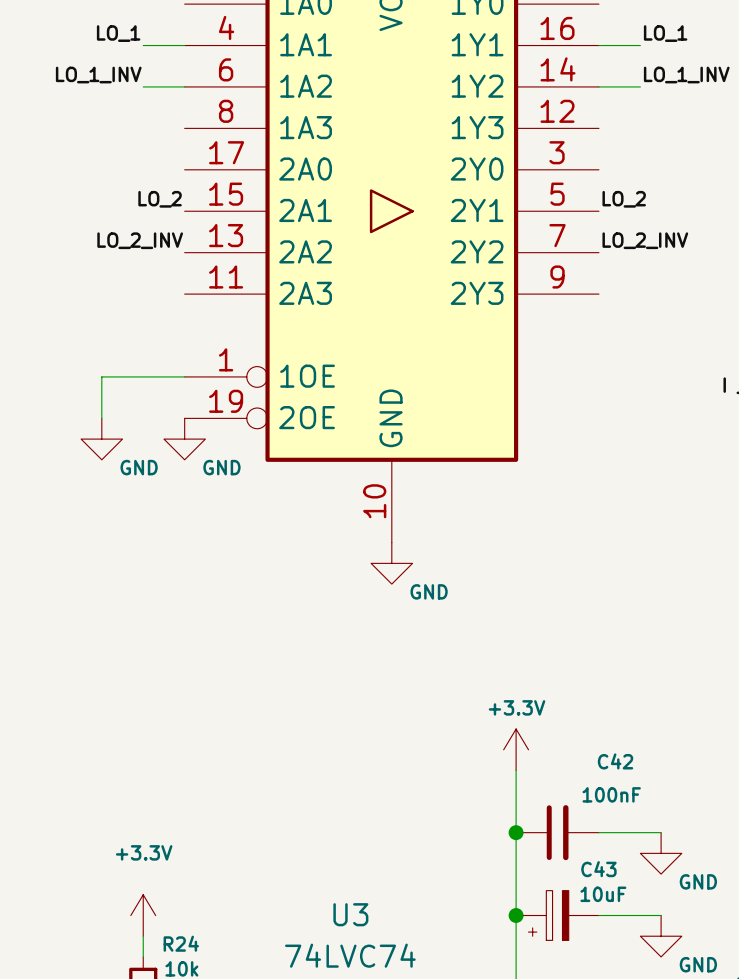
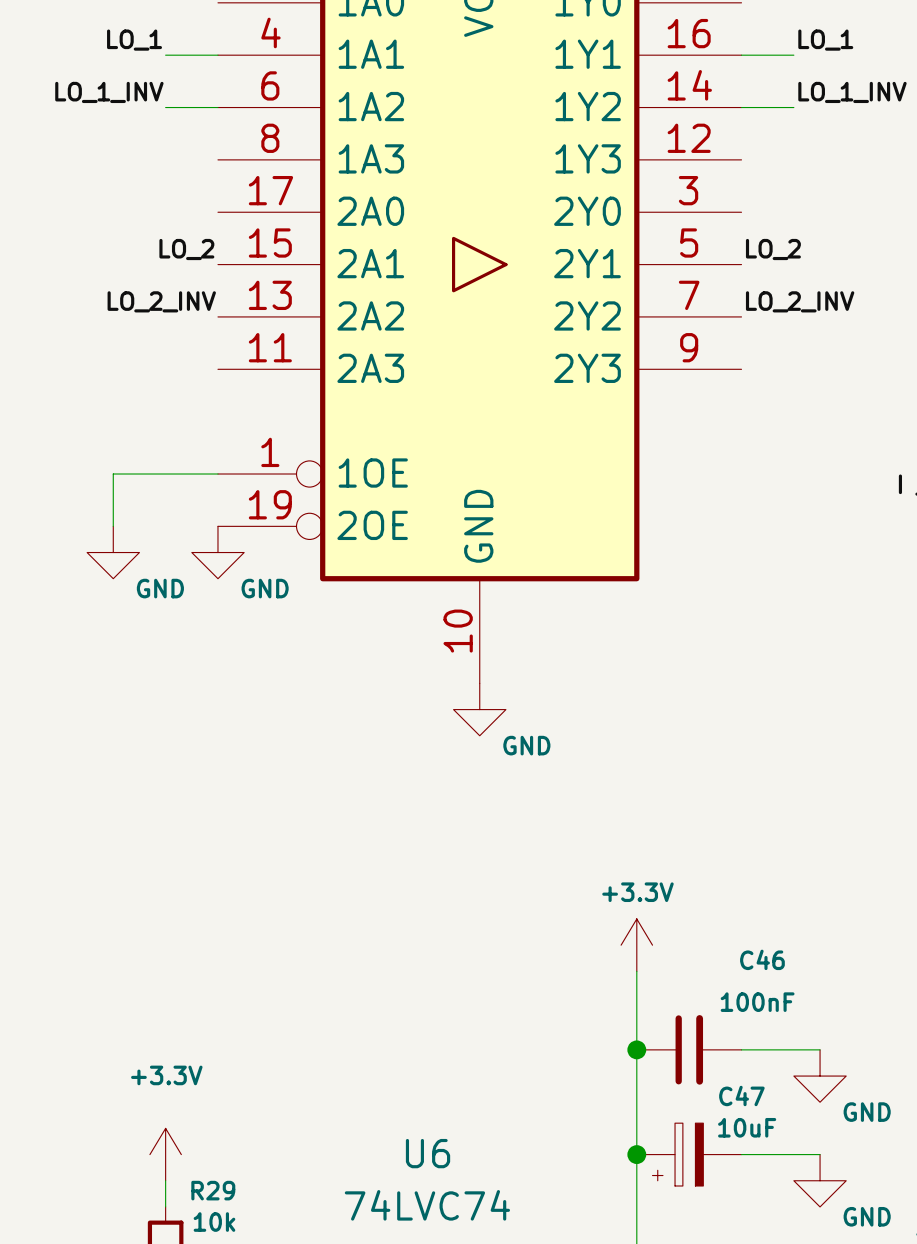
C42 name: C42 (615, 761) -> C46 (762, 959)
C43 name: C43 (598, 869) -> C47 (741, 1095)
U3 name: U3 (350, 914) -> U6 (428, 1153)
R24 name: R24 (181, 943) -> R29 (213, 1190)

